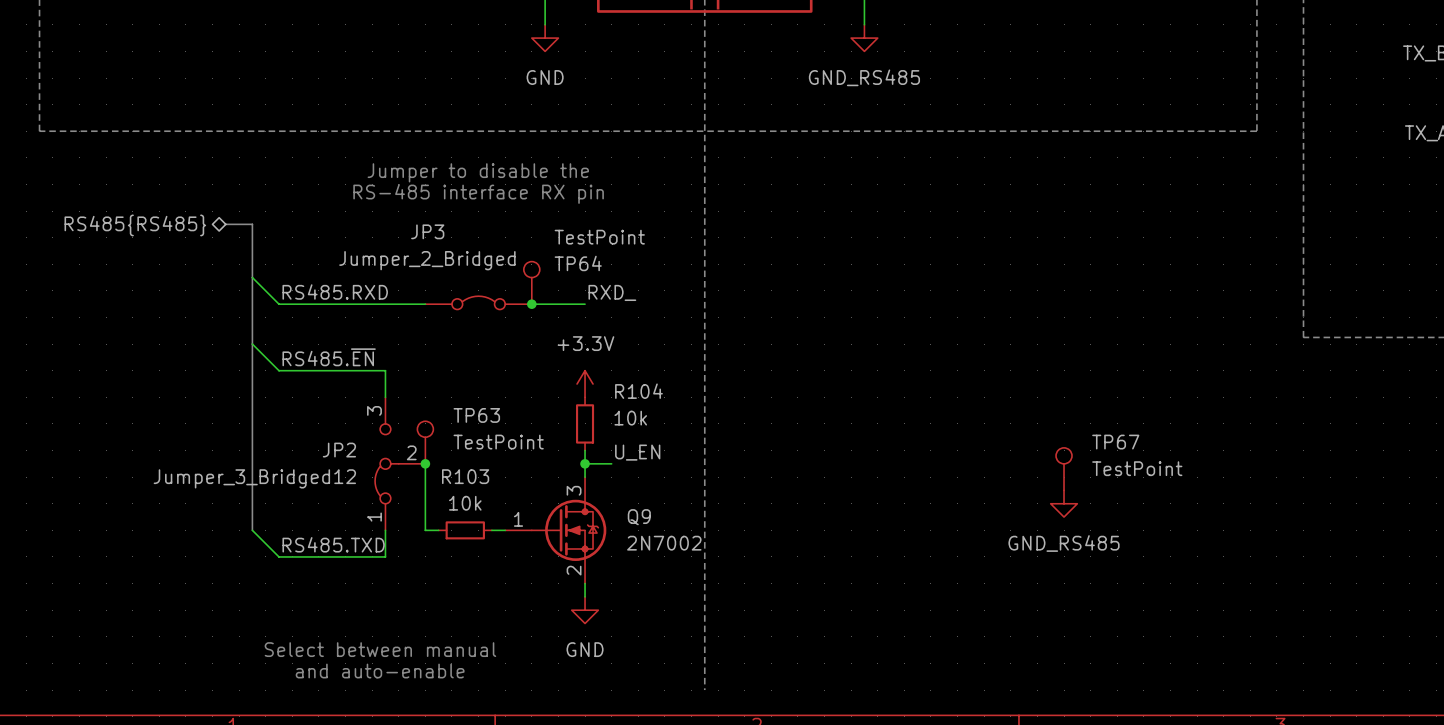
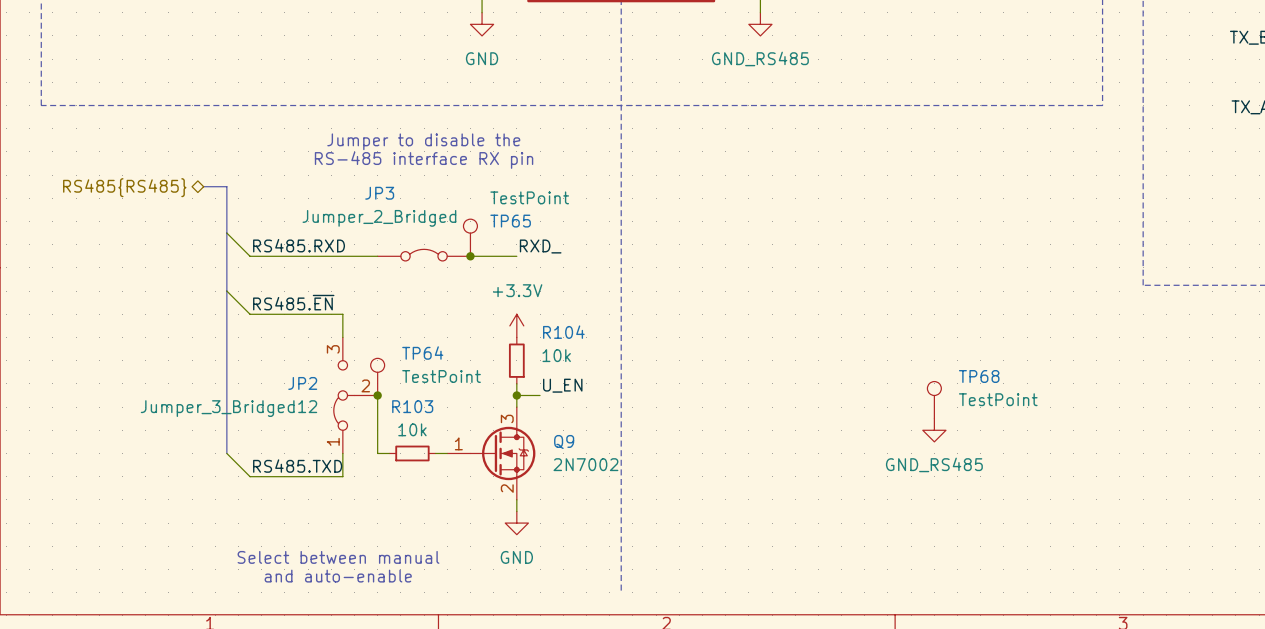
TP64 name: TP64 (578, 263) -> TP65 (510, 221)
TP63 name: TP63 (476, 415) -> TP64 (422, 353)
TP67 name: TP67 (1115, 442) -> TP68 (979, 376)

